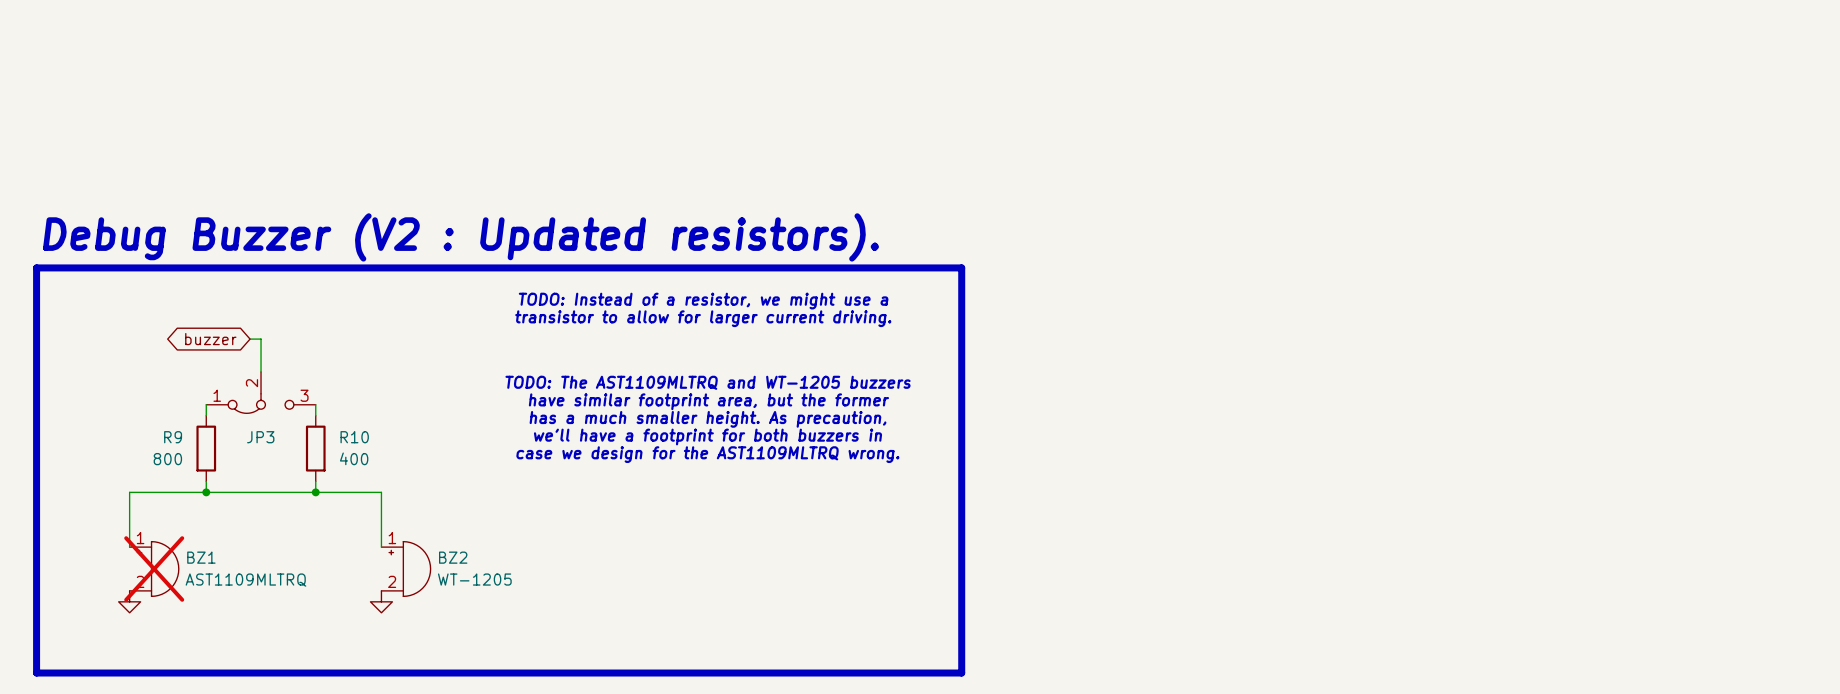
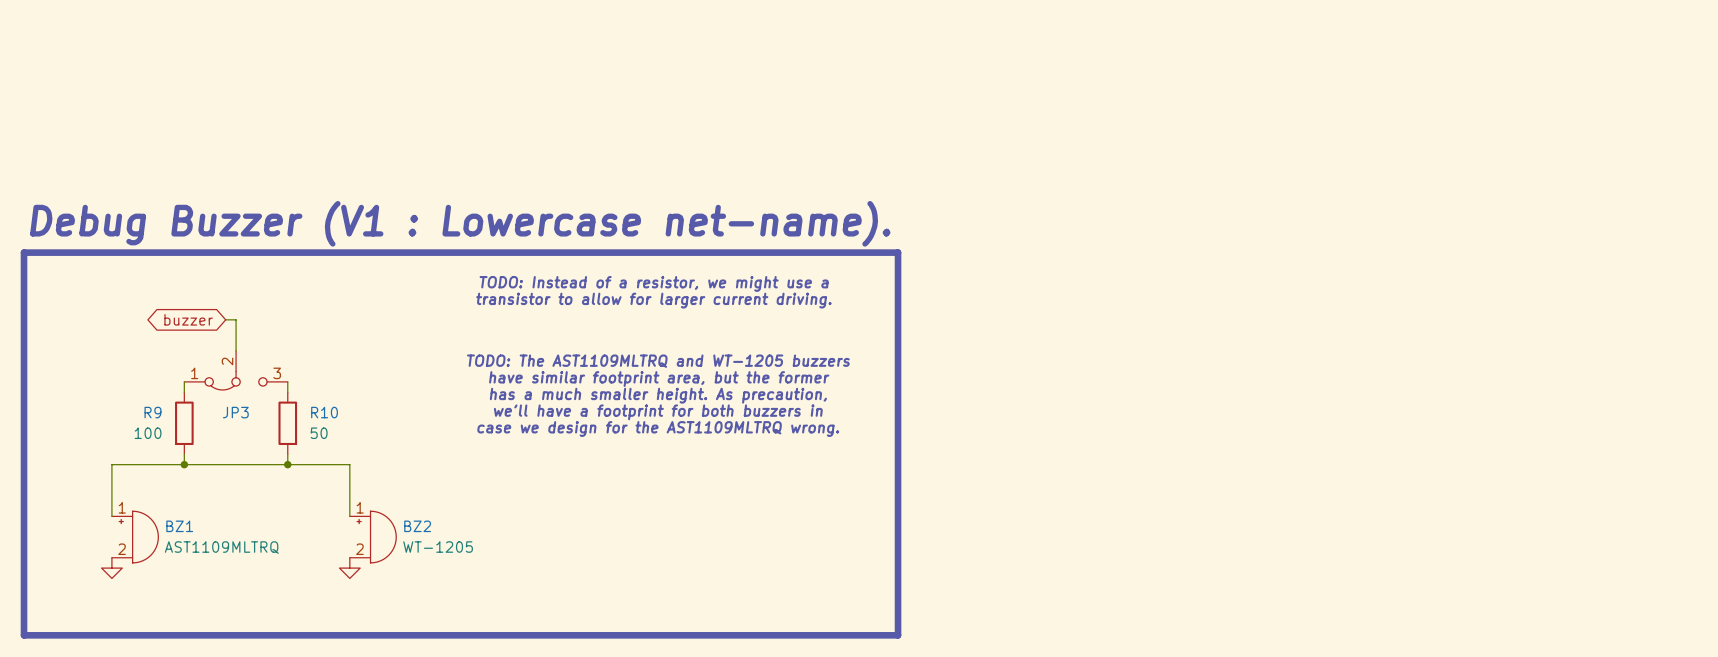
text: Debug Buzzer (V2 : Updated resistors). (461, 237) -> Debug Buzzer (V1 : Lowercase net-name). (460, 223)
R10 value: 400 (354, 458) -> 50 (319, 433)
R9 value: 800 (167, 459) -> 100 (148, 433)
BZ1 do-not-place cross: (154, 569) -> none

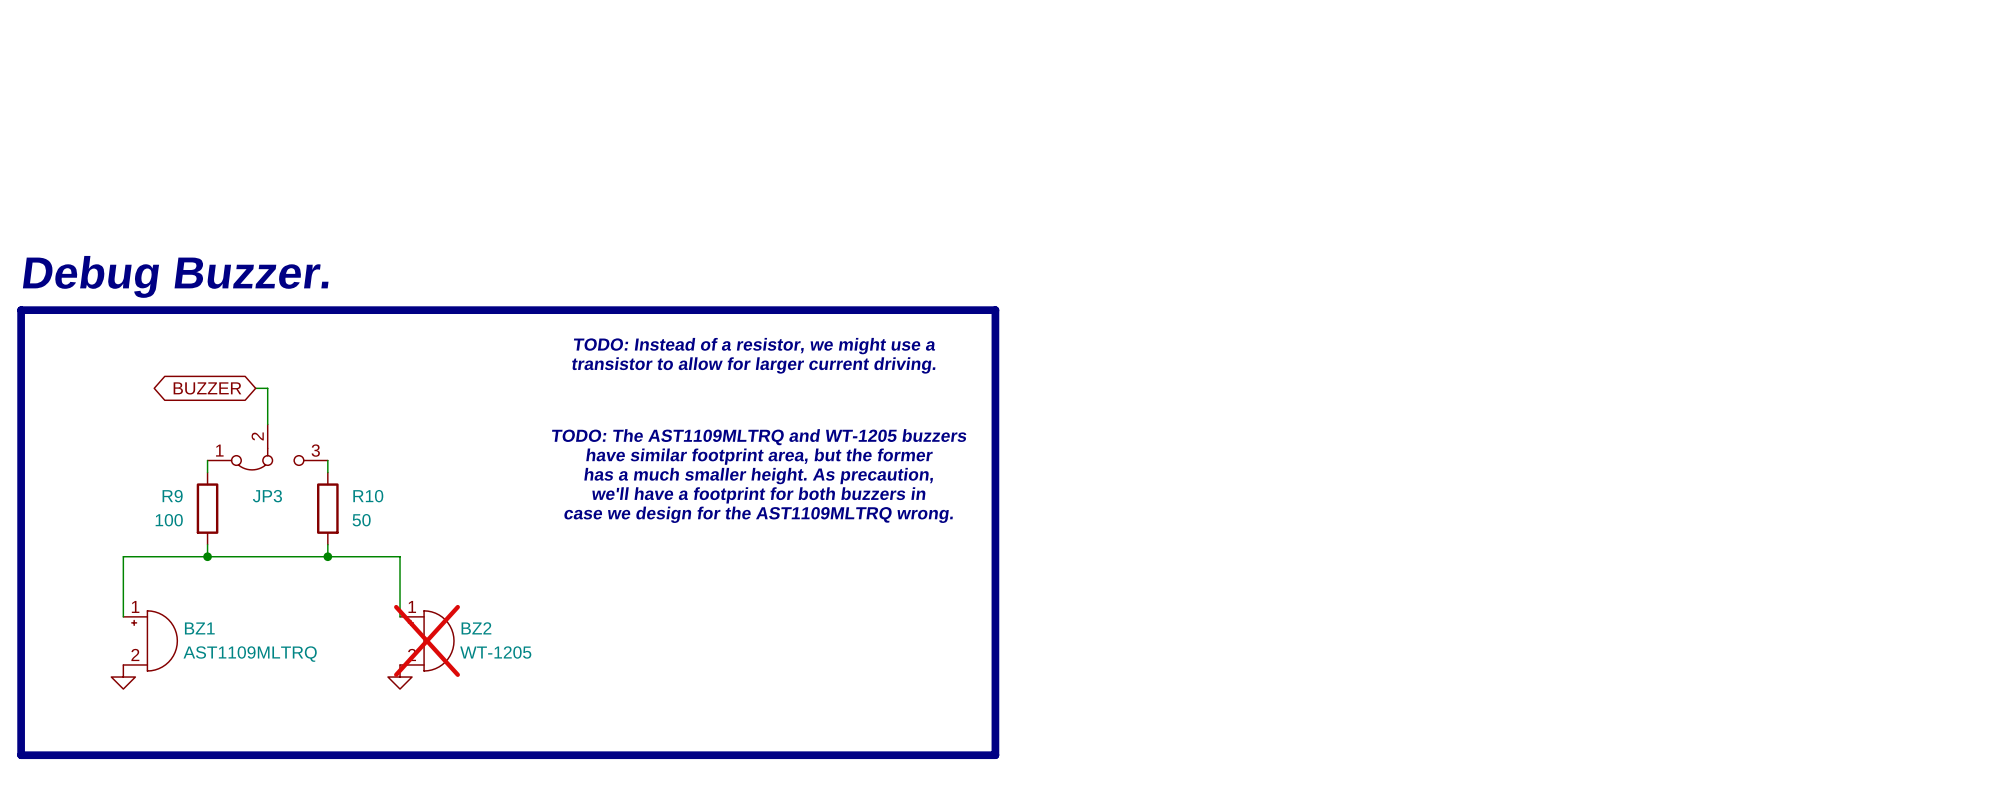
text: Debug Buzzer (V1 : Lowercase net-name). (460, 223) -> Debug Buzzer. (175, 276)
line: (861, 252) (898, 252) (898, 635) (861, 635) -> (995, 310) (995, 755)
global label: buzzer (188, 319) -> BUZZER (207, 388)
BZ2 do-not-place cross: none -> (427, 640)

